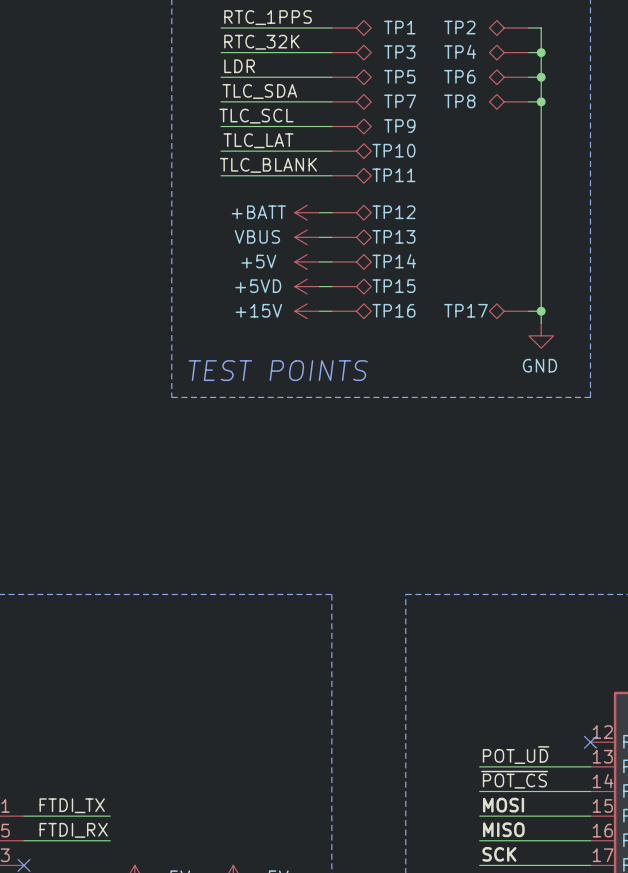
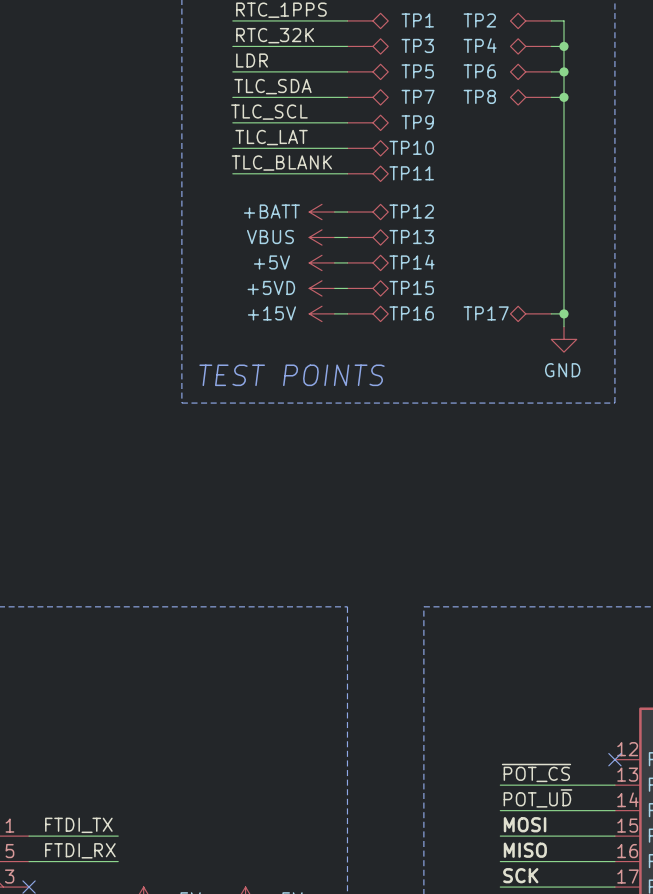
label: POT_U~{D} (516, 755) -> ~{POT_CS} (536, 772)
label: ~{POT_CS} (514, 779) -> POT_U~{D} (537, 798)

